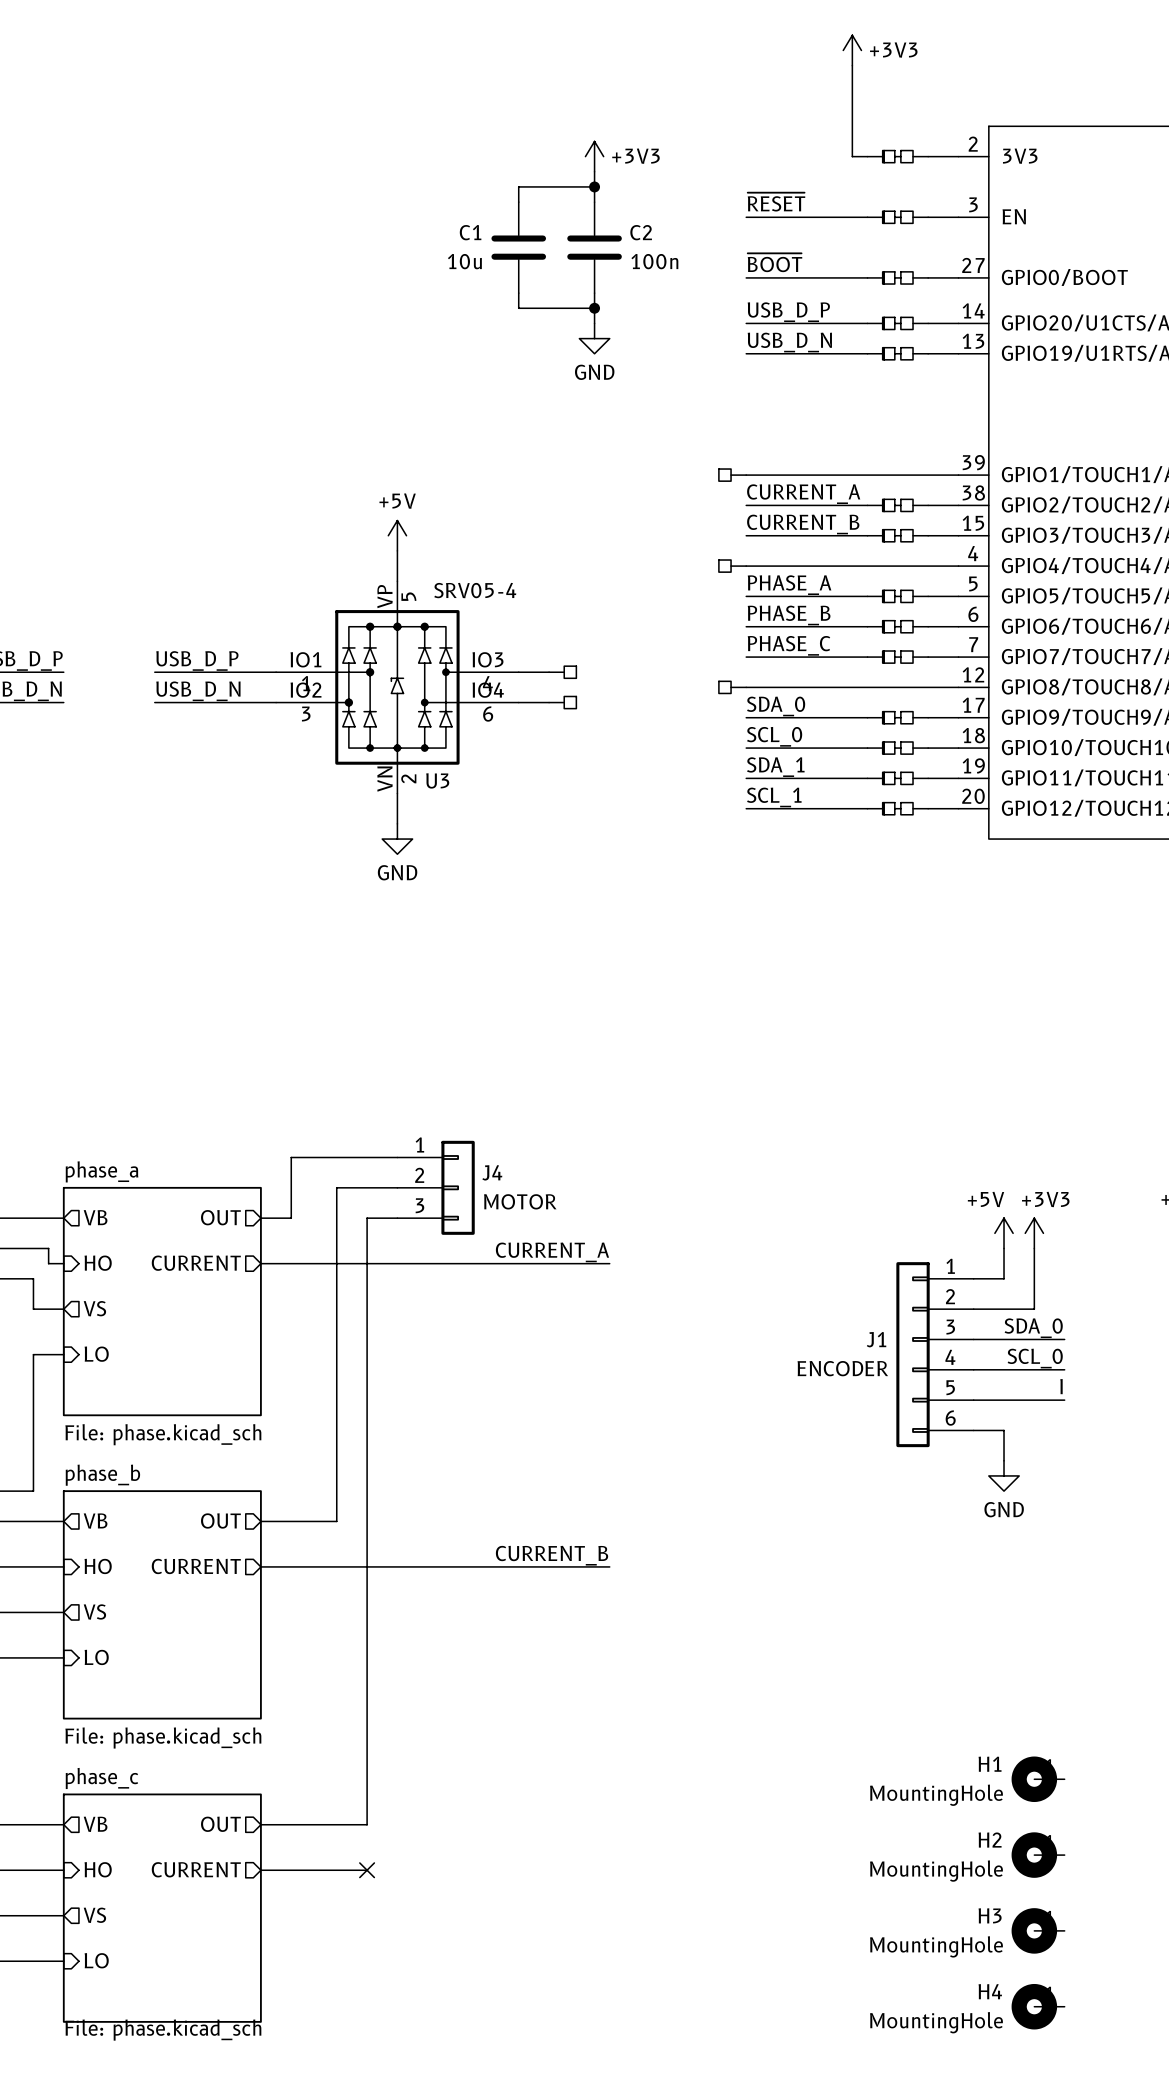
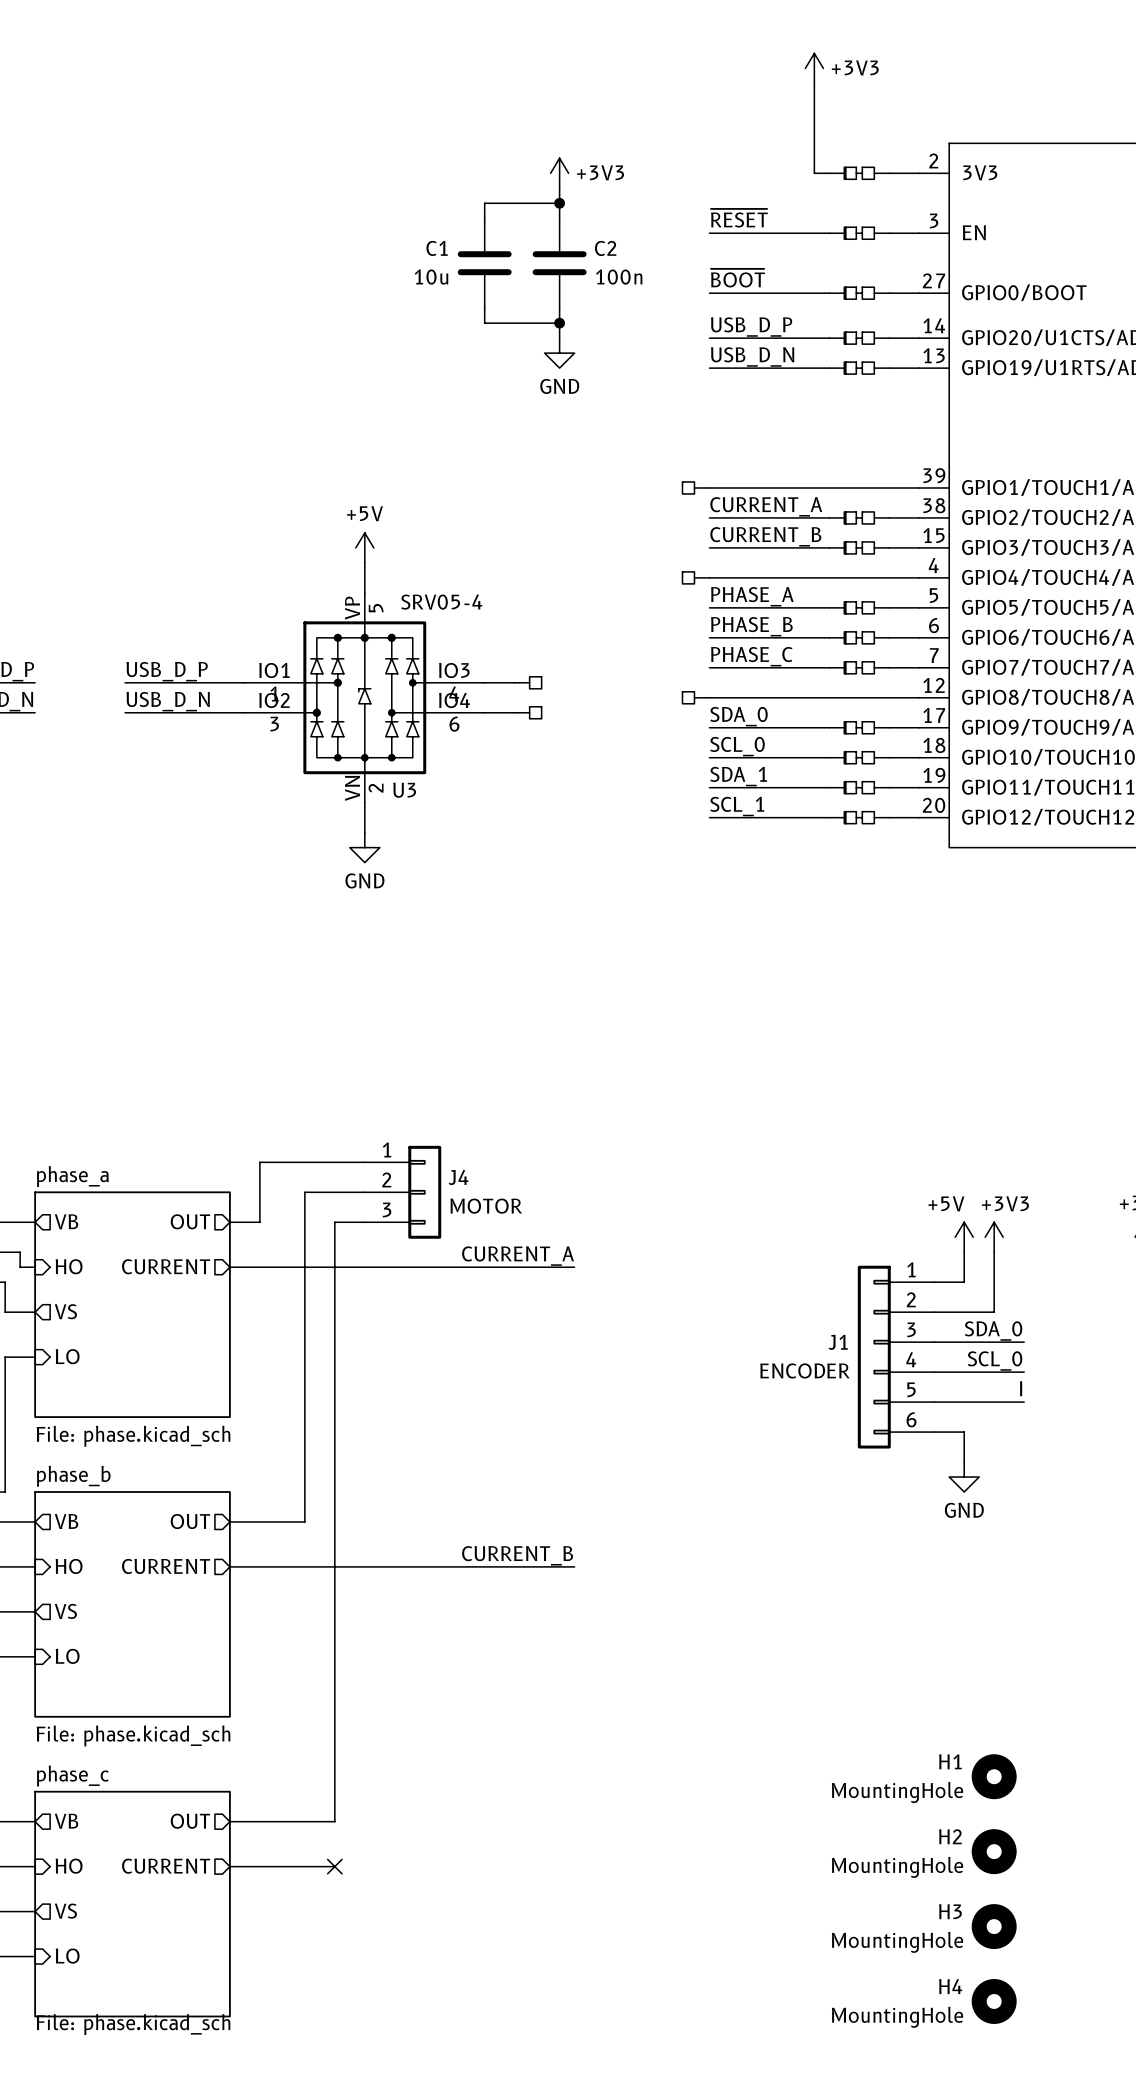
H1 symbol: [1011, 1756, 1065, 1803] -> [971, 1754, 1017, 1800]
H2 symbol: [1011, 1832, 1065, 1878] -> [971, 1829, 1017, 1875]
H3 symbol: [1011, 1908, 1065, 1954] -> [971, 1904, 1017, 1950]
H4 symbol: [1011, 1983, 1065, 2030] -> [971, 1979, 1017, 2024]

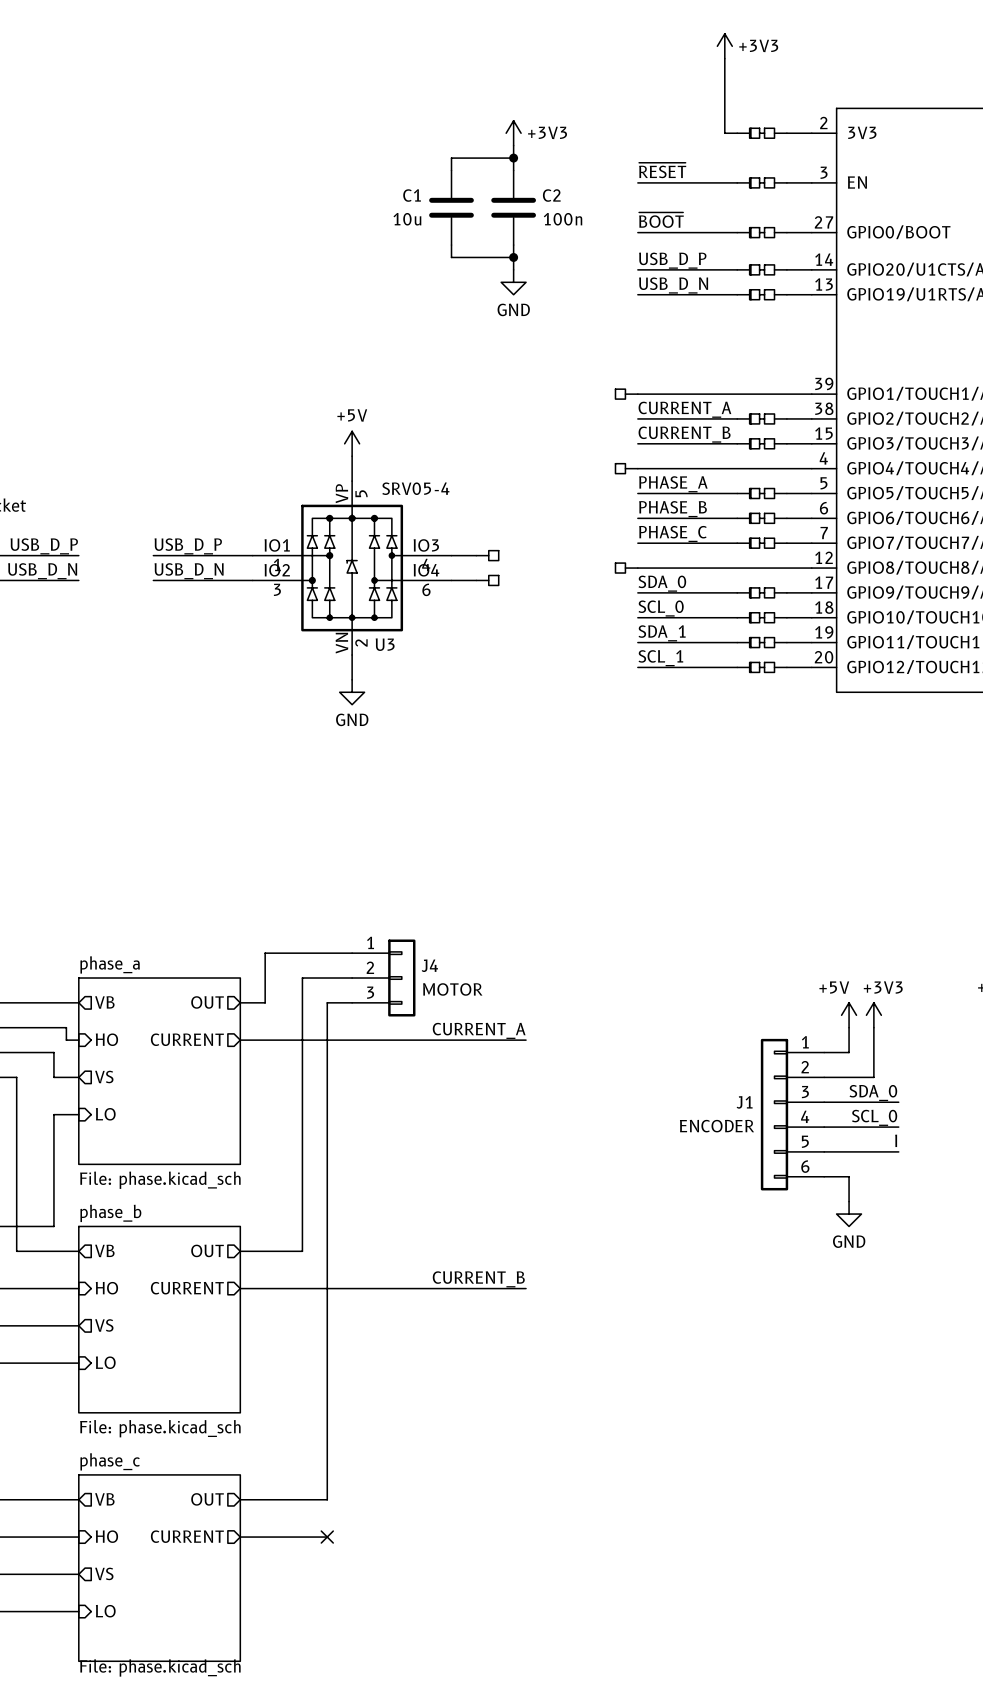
H1: MountingHole (994, 1776) -> none
H2: MountingHole (994, 1851) -> none
H3: MountingHole (994, 1926) -> none
H4: MountingHole (994, 2001) -> none

